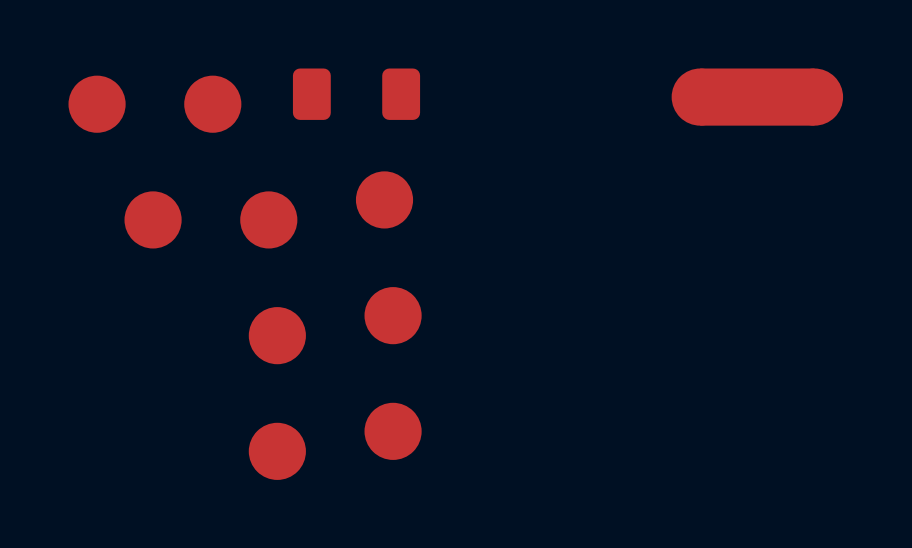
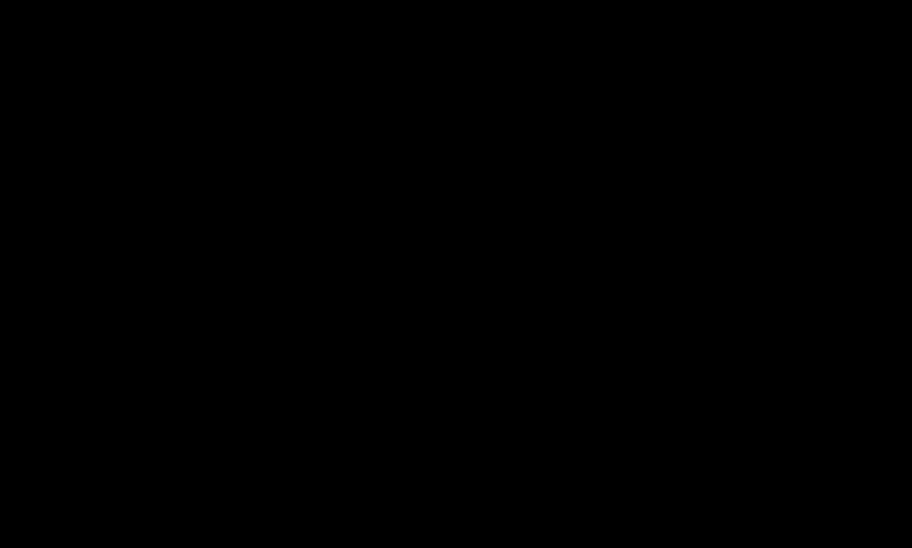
part: (356, 94) -> none
part: (757, 97) -> none
part: (97, 104) -> none
part: (212, 104) -> none
part: (384, 199) -> none
part: (153, 219) -> none
part: (268, 219) -> none
part: (393, 315) -> none
part: (277, 335) -> none
part: (393, 431) -> none
part: (277, 451) -> none

